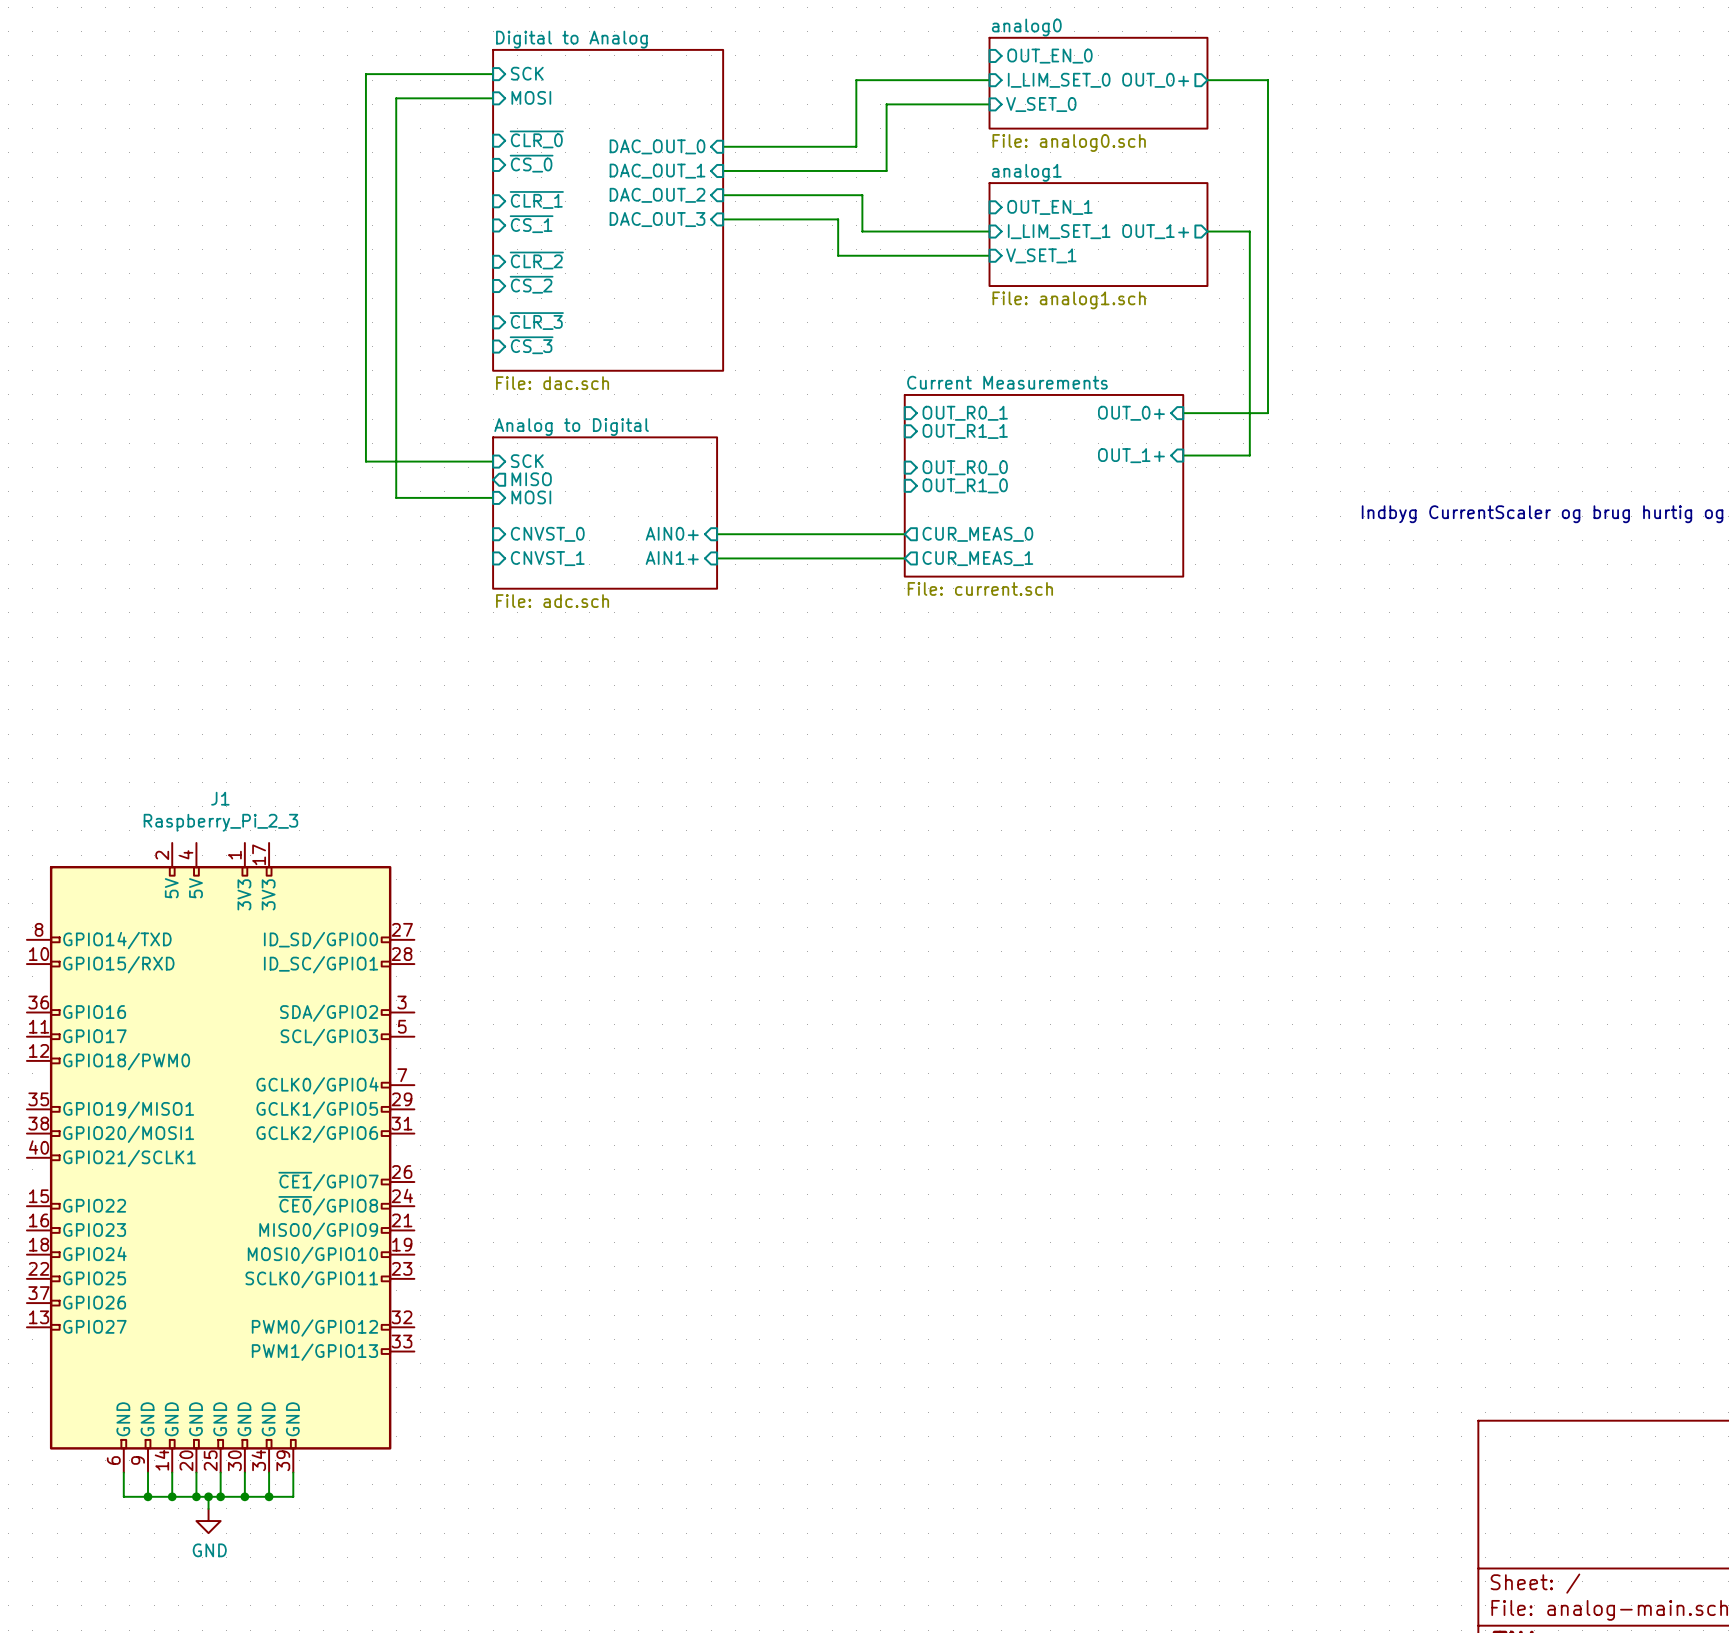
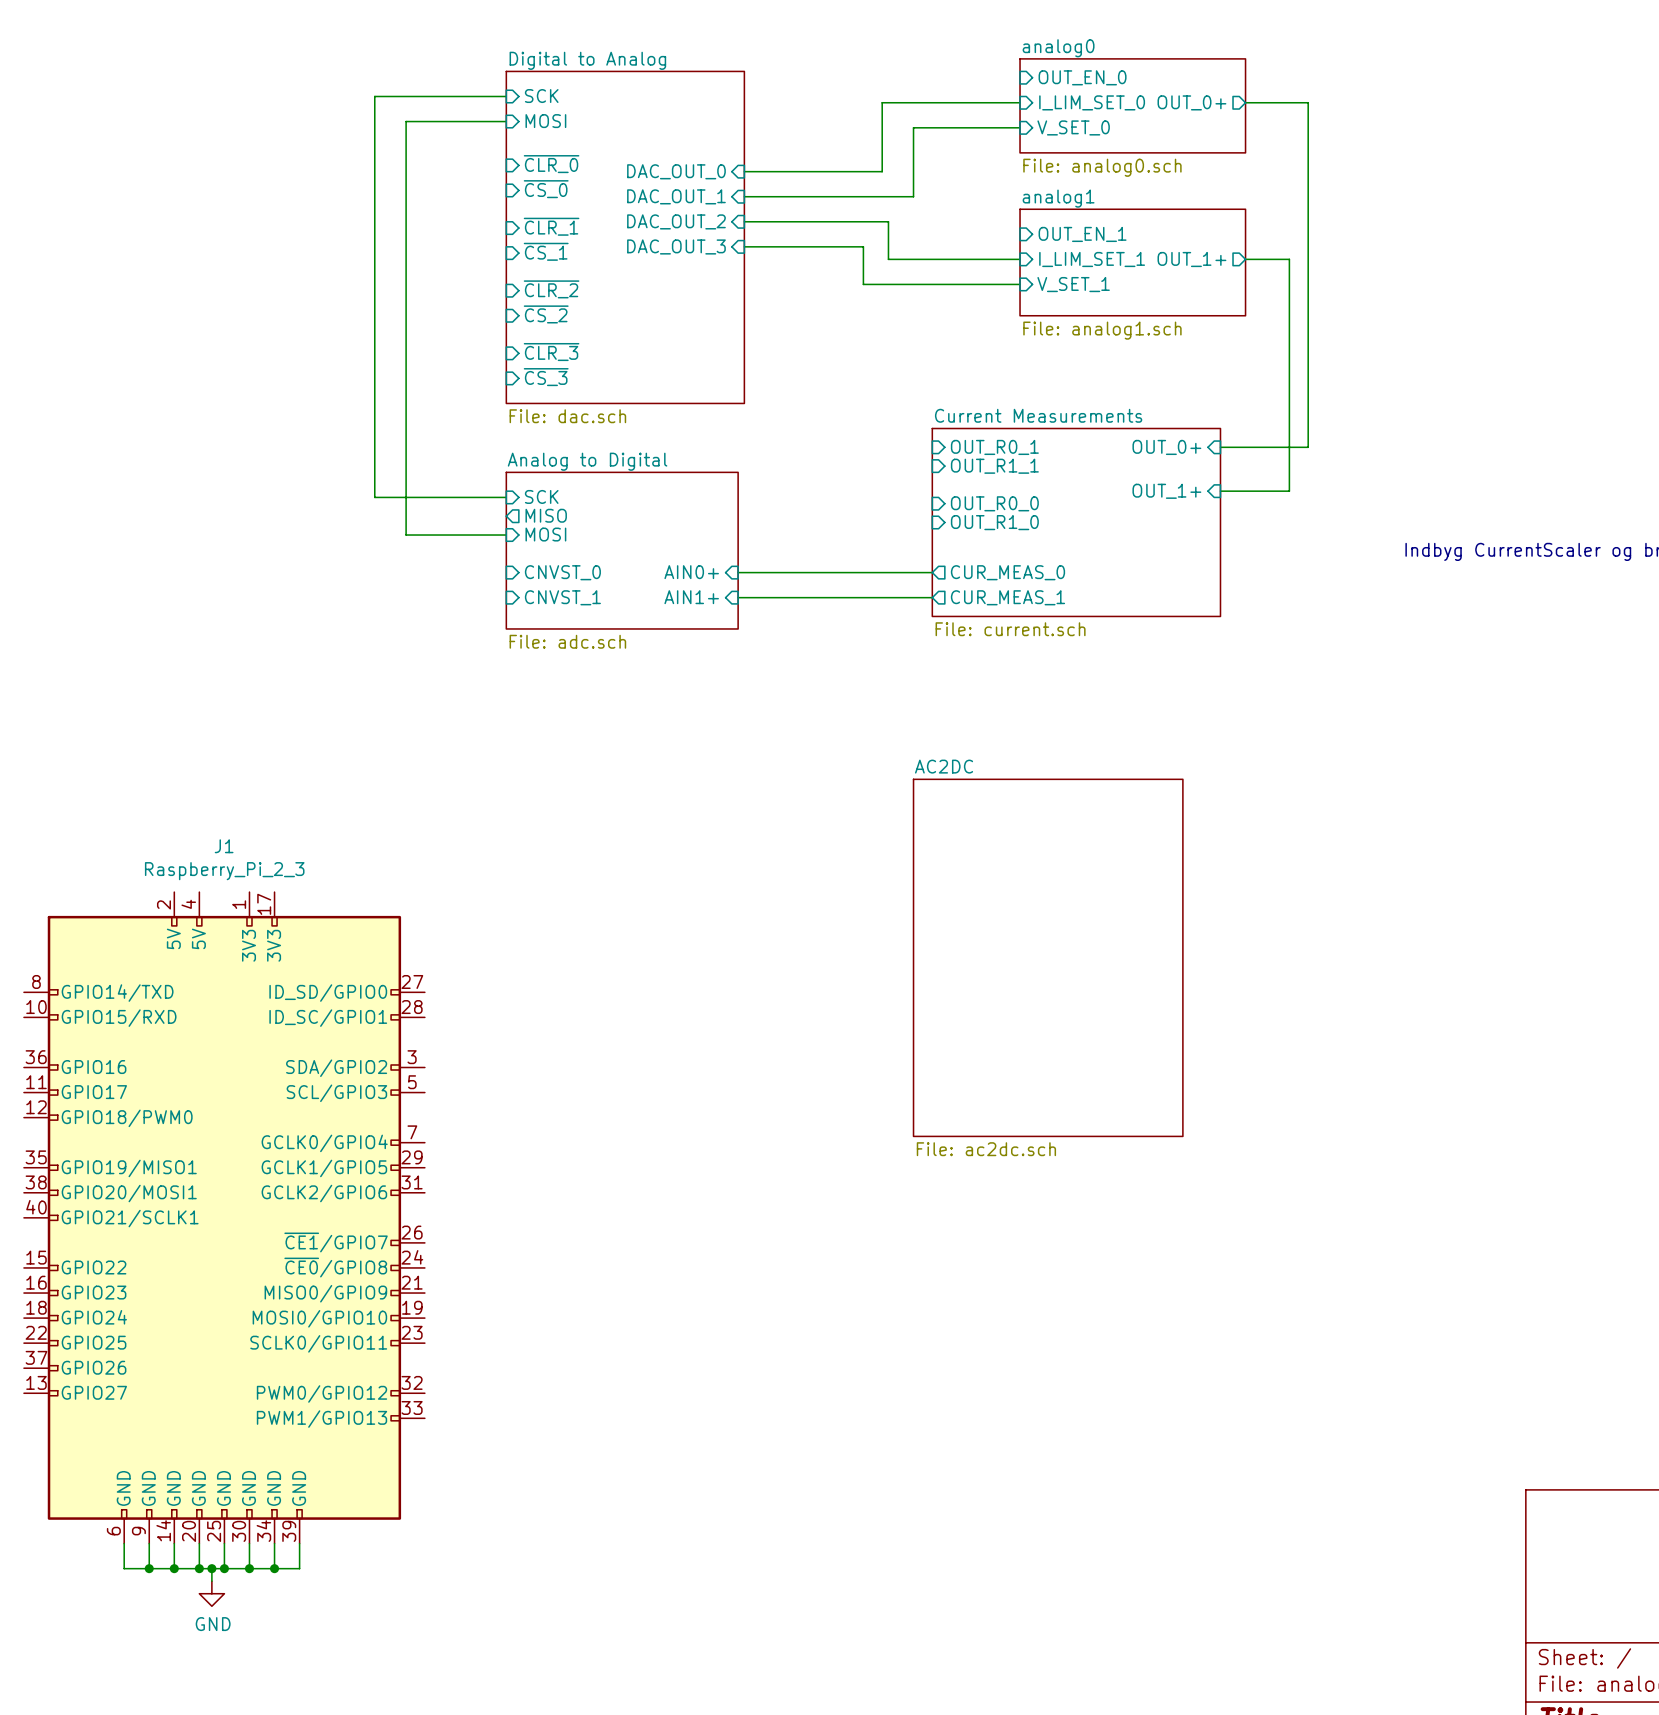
sheet AC2DC: none -> File: ac2dc.sch (1048, 957)

